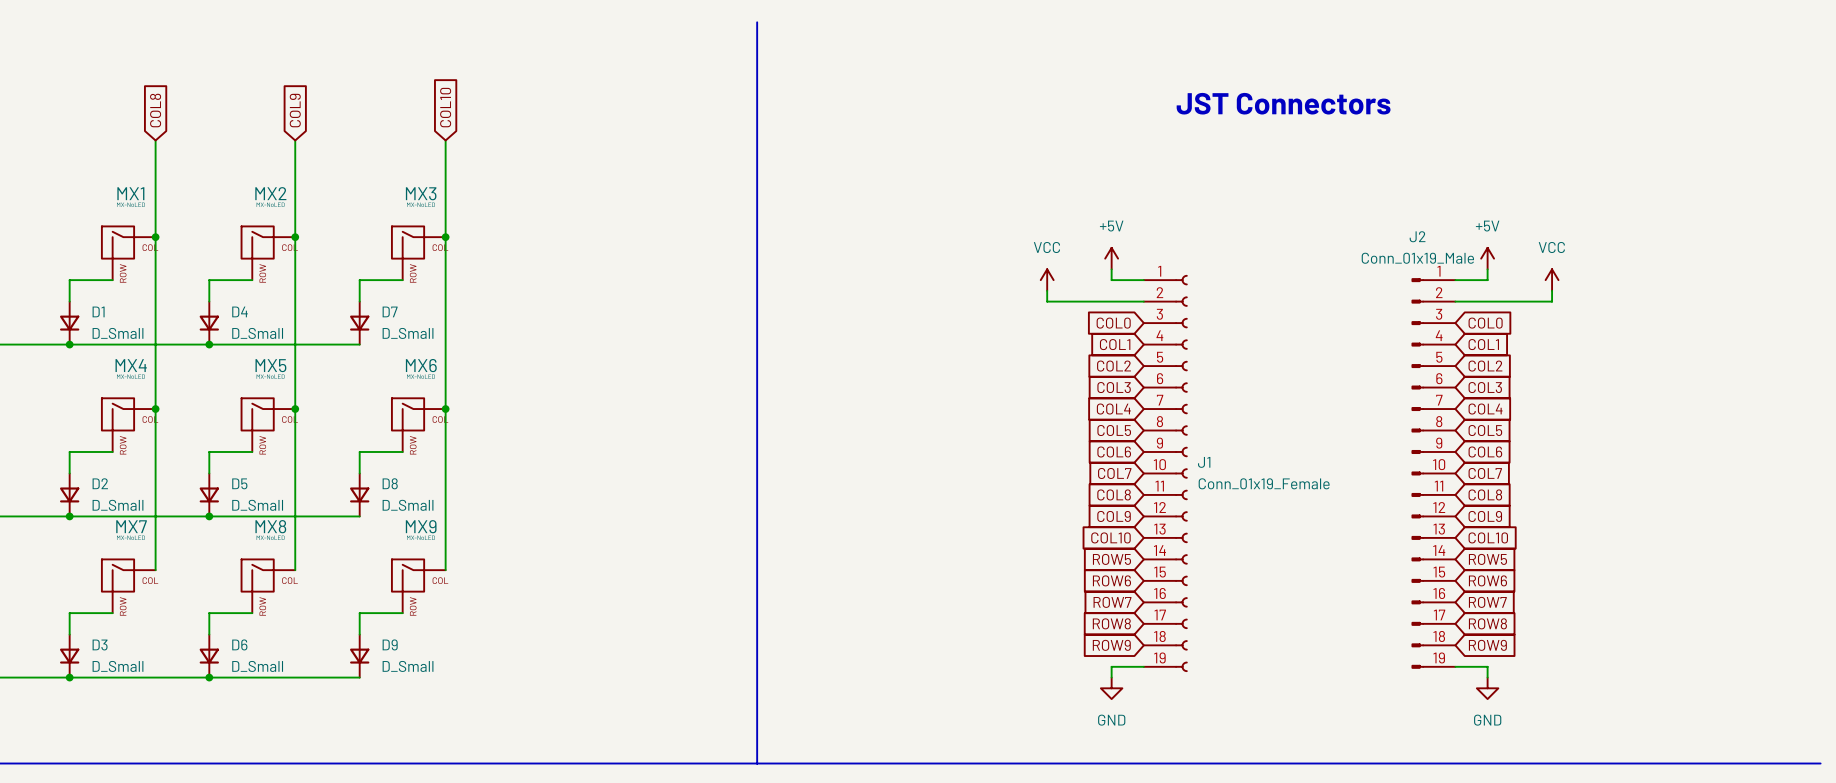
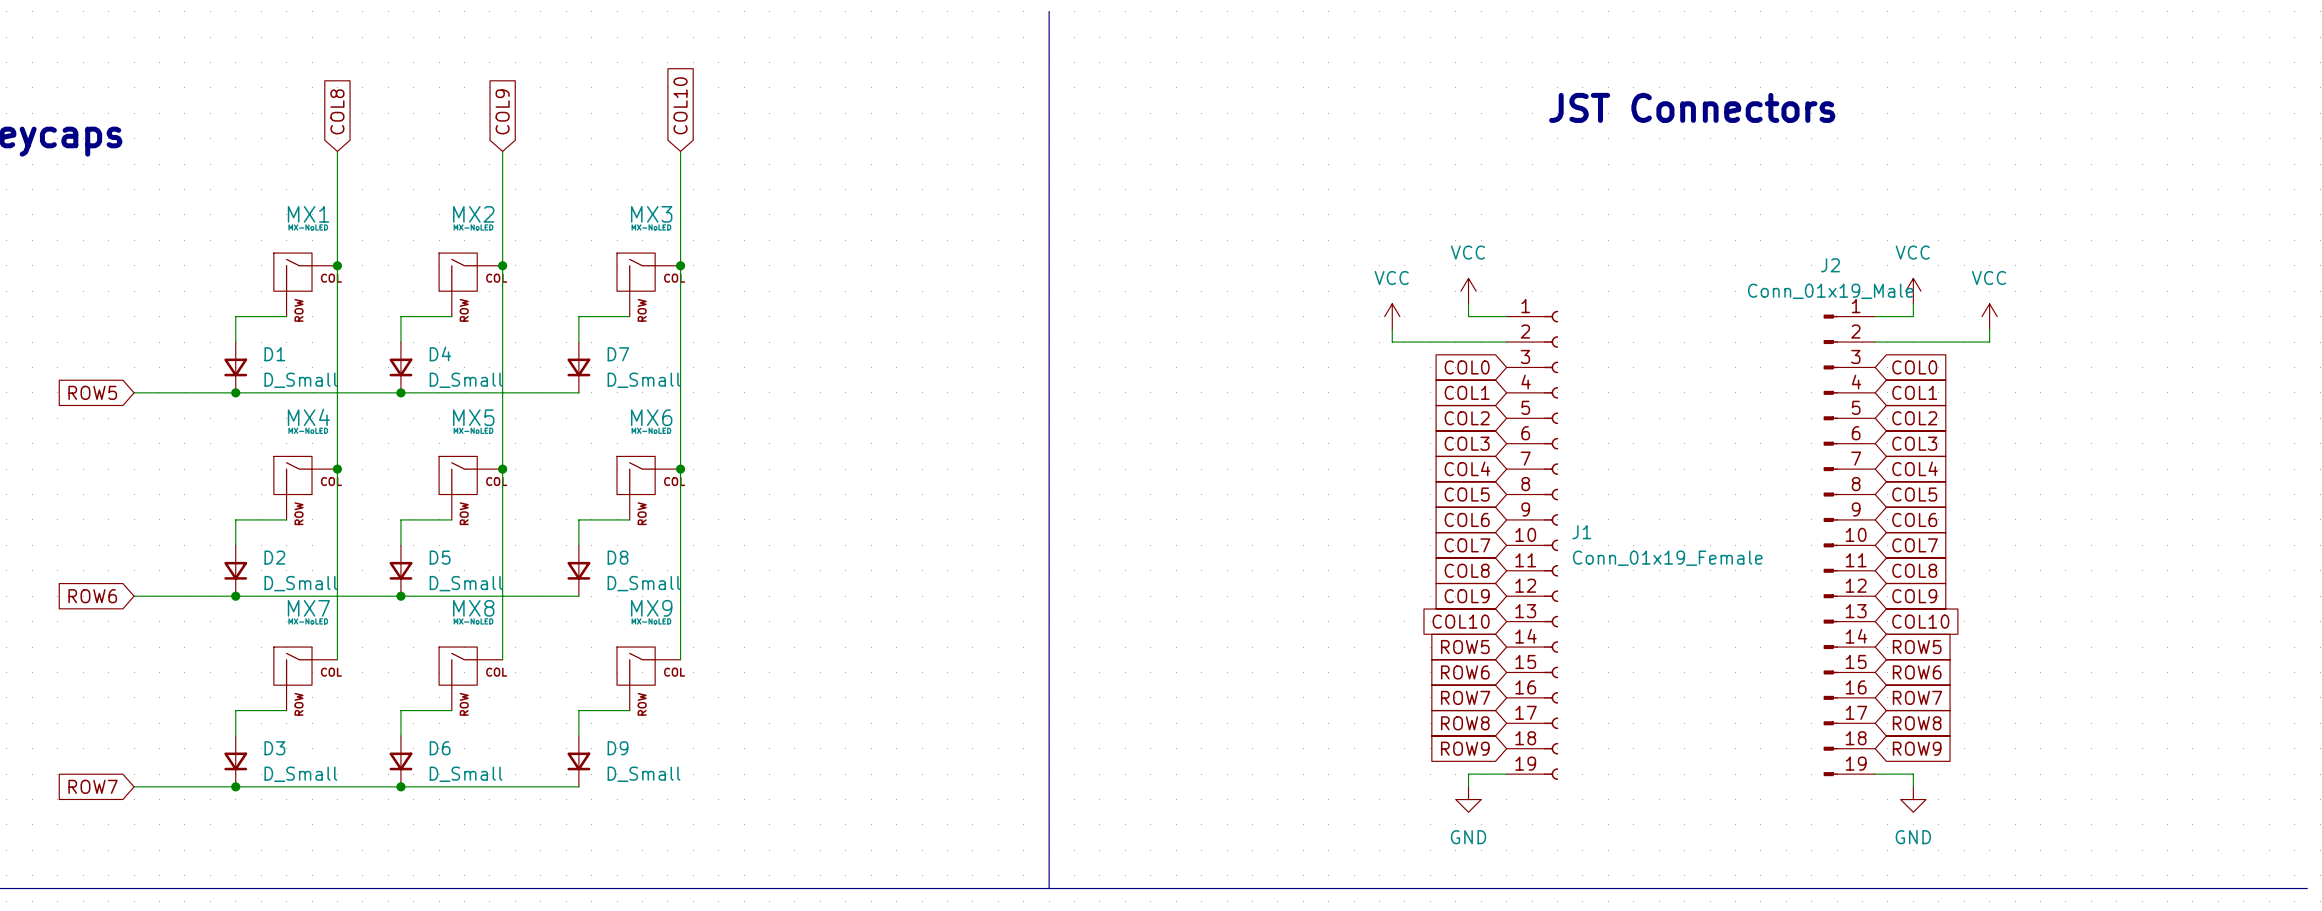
power symbol: +5V (1111, 258) -> VCC (1468, 291)
power symbol: +5V (1487, 258) -> VCC (1913, 291)

